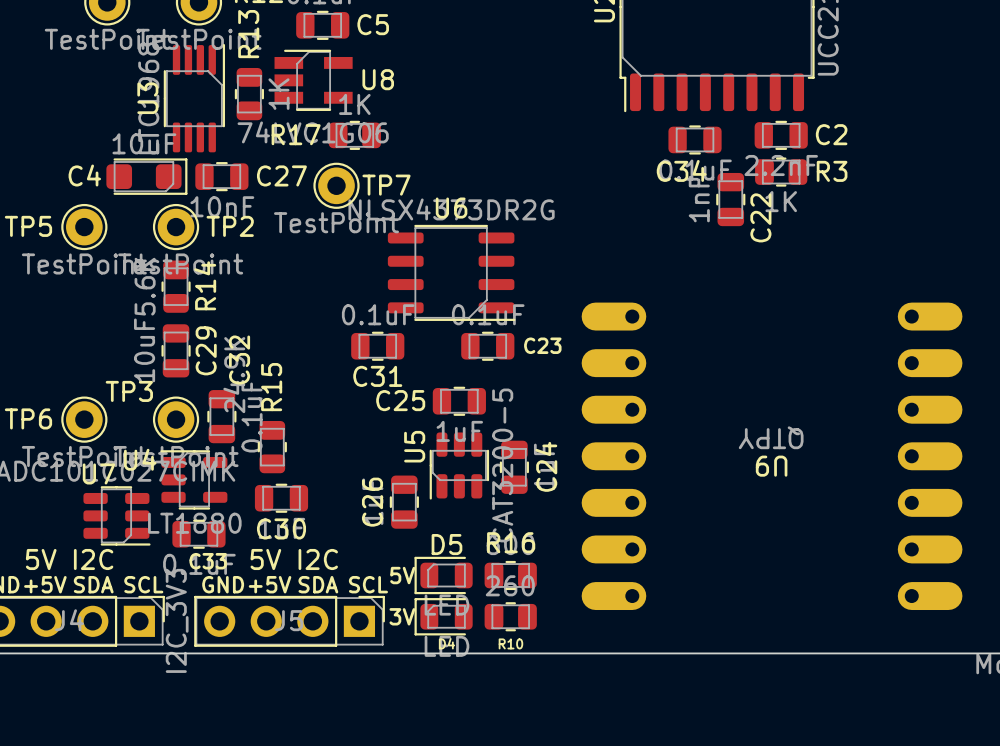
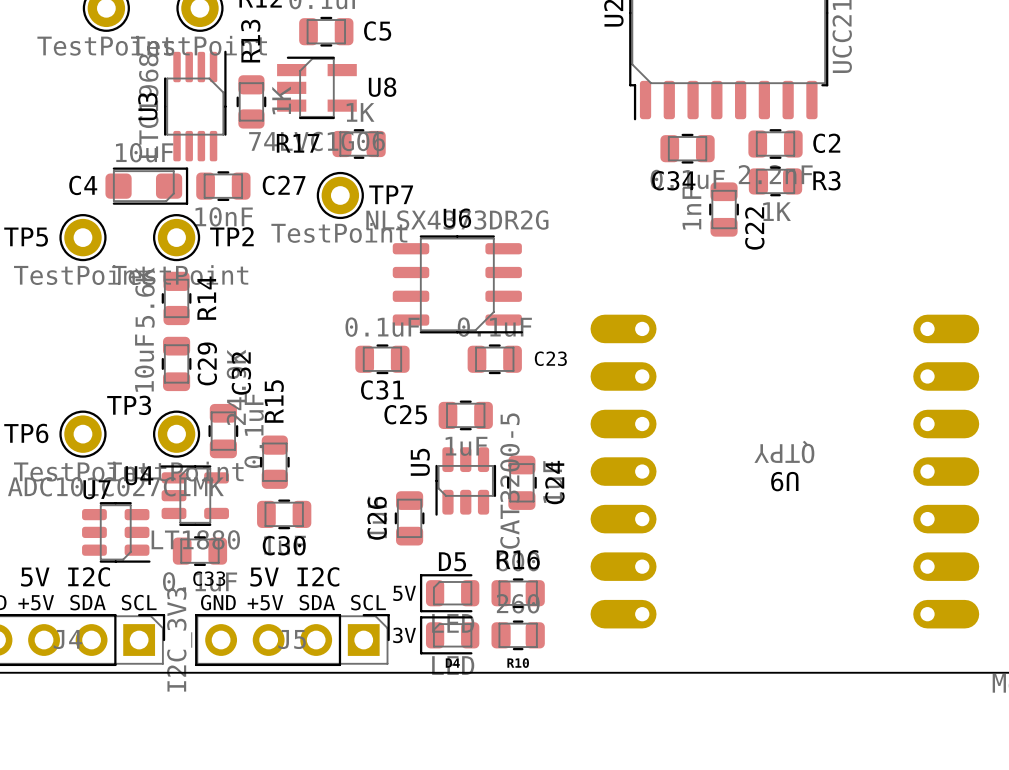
C2 position: (781, 135) -> (775, 144)
C34 position: (695, 139) -> (687, 148)
R3 position: (781, 172) -> (775, 181)
C22 position: (730, 199) -> (724, 209)

